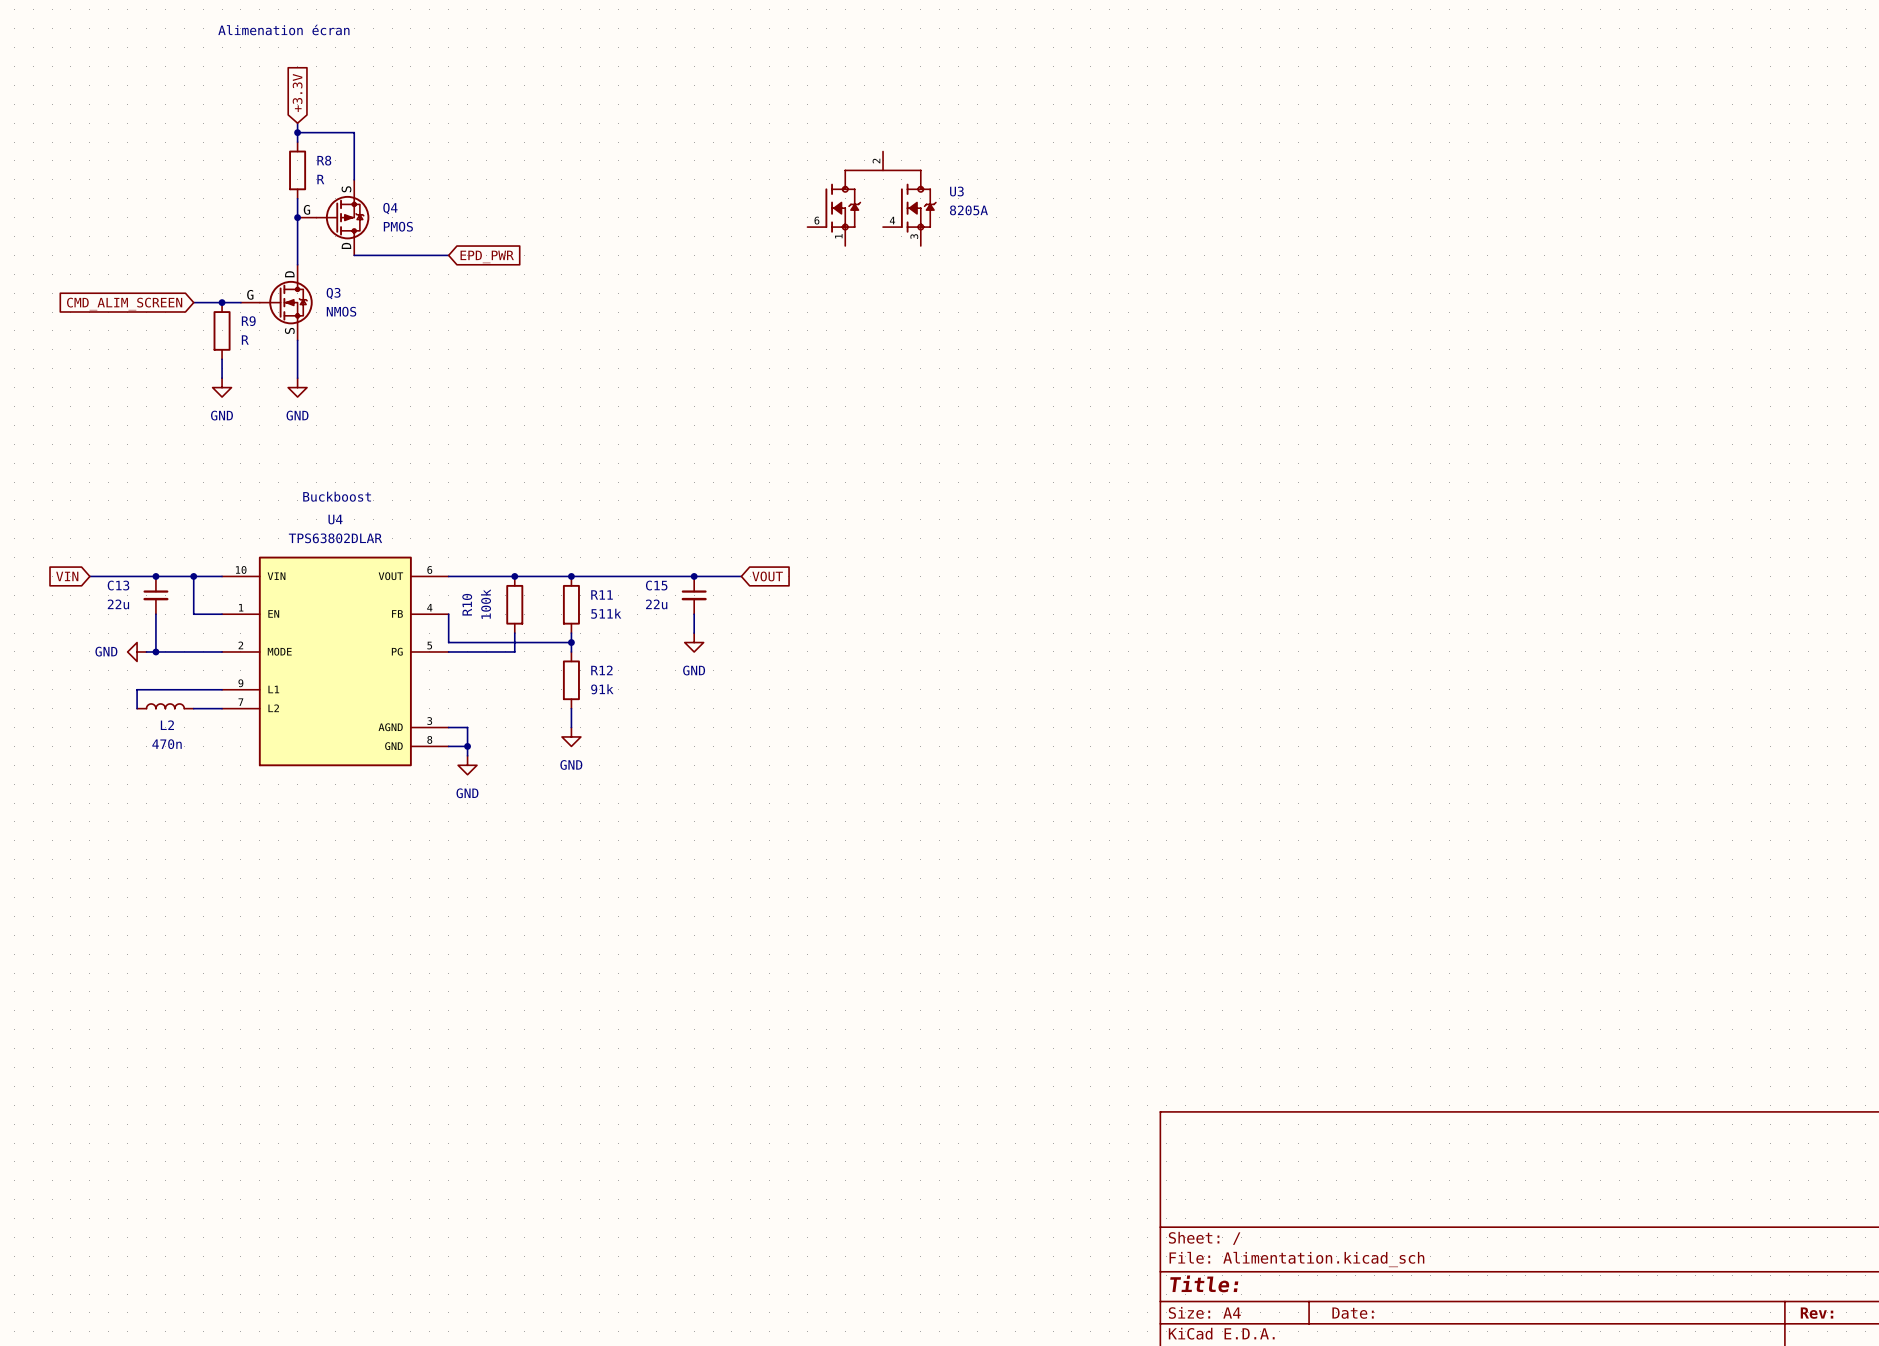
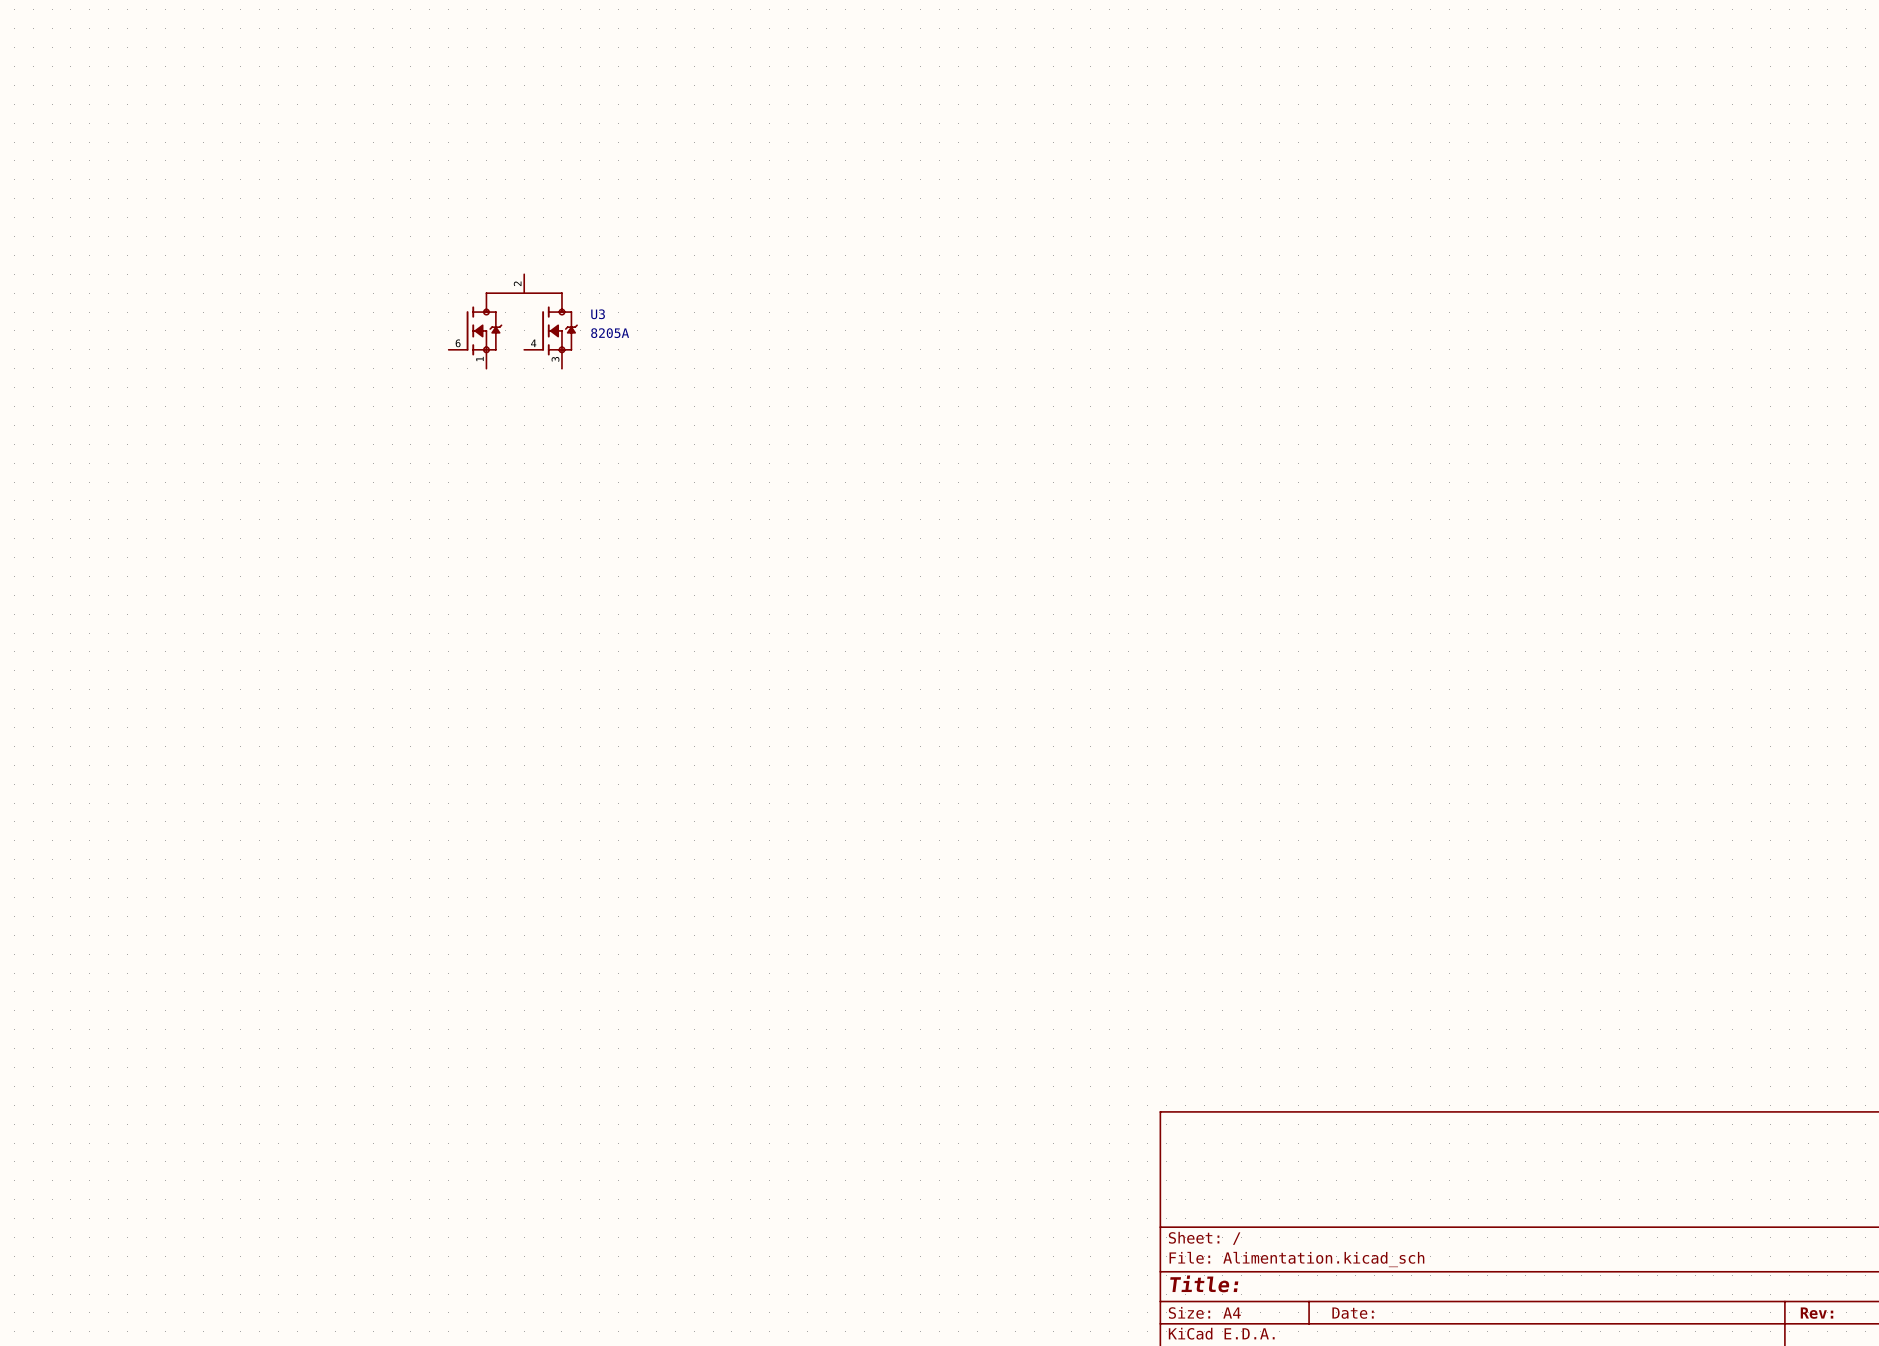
text: Alimenation écran (283, 29) -> none
global label: +3.3V (297, 92) -> none
wire: (297, 123) (297, 142) -> none
wire: (297, 132) (354, 132) (354, 179) -> none
junction: (297, 132) -> none
R8: R (297, 170) -> none
wire: (297, 198) (297, 264) -> none
U3 position: (871, 198) -> (513, 321)
junction: (297, 217) -> none
Q4: PMOS (333, 217) -> none
wire: (354, 255) (448, 255) -> none
global label: EPD_PWR (487, 256) -> none
wire: (193, 302) (240, 302) -> none
junction: (222, 302) -> none
Q3: NMOS (276, 302) -> none
global label: CMD_ALIM_SCREEN (124, 304) -> none
R9: R (222, 330) -> none
wire: (297, 340) (297, 378) -> none
wire: (222, 359) (222, 378) -> none
power symbol: GND (222, 387) -> none
power symbol: GND (297, 387) -> none
text: Buckboost (337, 496) -> none
global label: VIN (67, 576) -> none
wire: (89, 576) (222, 576) -> none
junction: (155, 576) -> none
wire: (193, 576) (193, 614) (222, 614) -> none
junction: (193, 576) -> none
wire: (448, 576) (741, 576) -> none
junction: (514, 576) -> none
junction: (571, 576) -> none
junction: (694, 576) -> none
global label: VOUT (767, 576) -> none
C13: 22u (155, 595) -> none
C15: 22u (694, 595) -> none
R10: 100k (514, 604) -> none
R11: 511k (571, 604) -> none
wire: (155, 614) (155, 651) -> none
wire: (448, 614) (448, 642) (571, 642) -> none
wire: (694, 614) (694, 633) -> none
wire: (514, 633) (514, 651) (448, 651) -> none
wire: (571, 633) (571, 651) -> none
junction: (571, 642) -> none
power symbol: GND (694, 642) -> none
power symbol: GND (137, 651) -> none
wire: (146, 651) (222, 651) -> none
junction: (155, 651) -> none
U4: TPS63802DLAR (335, 661) -> none
R12: 91k (571, 680) -> none
wire: (222, 689) (137, 689) (137, 708) -> none
L2: 470n (165, 706) -> none
wire: (193, 708) (222, 708) -> none
wire: (571, 708) (571, 727) -> none
wire: (448, 727) (467, 727) (467, 755) -> none
power symbol: GND (571, 736) -> none
wire: (448, 746) (467, 746) -> none
junction: (467, 746) -> none
power symbol: GND (467, 765) -> none

